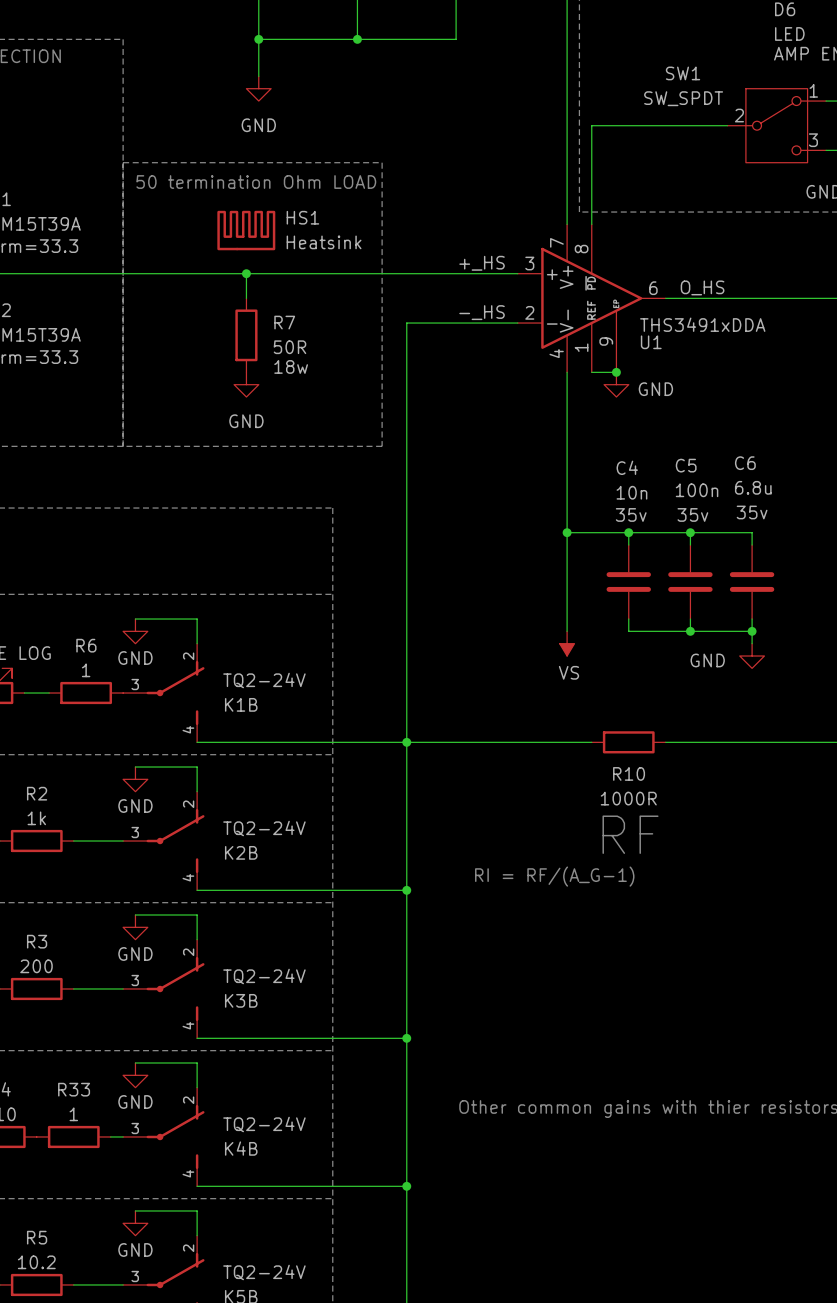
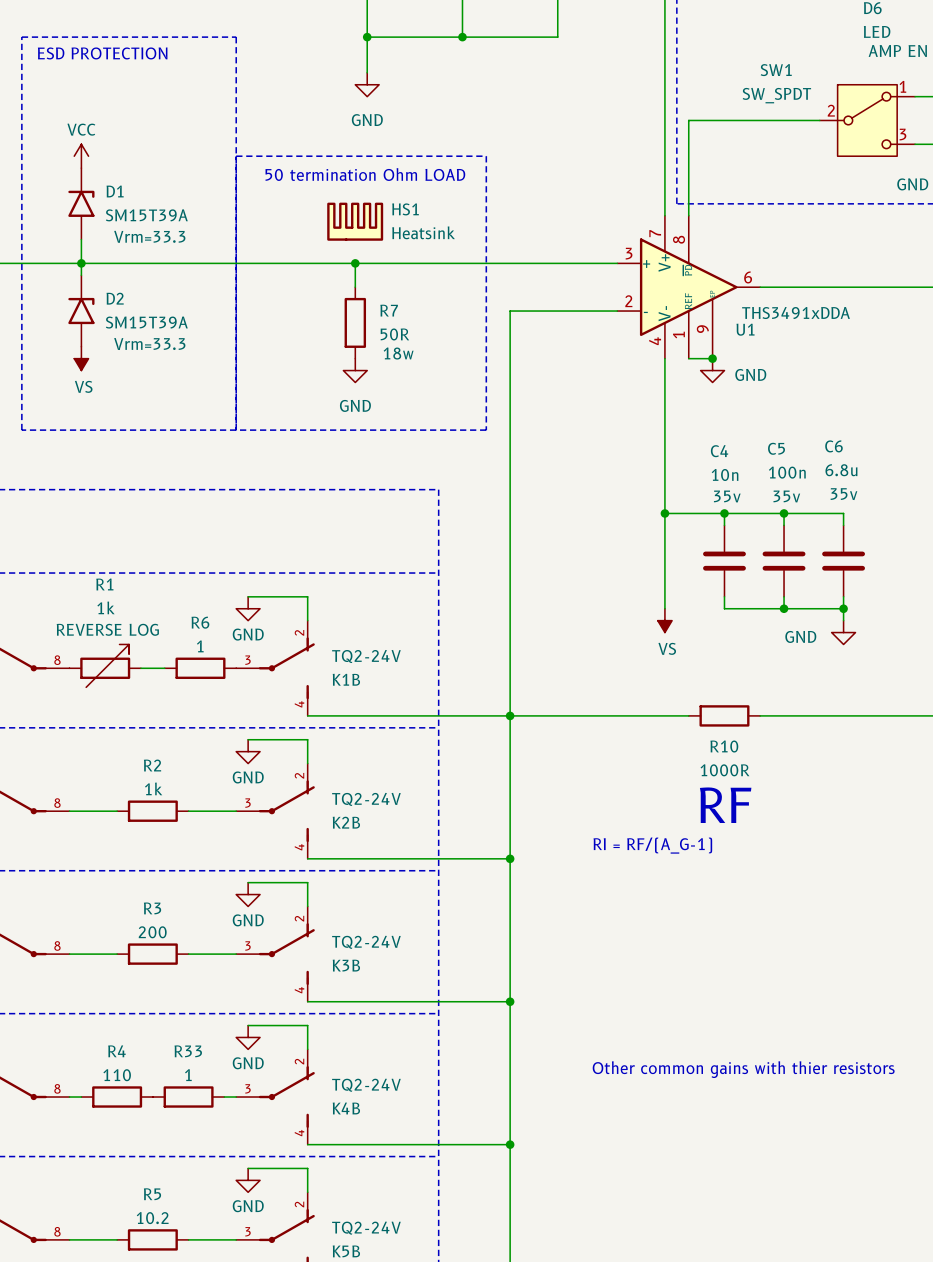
label: +_HS (482, 263) -> none
label: O_HS (702, 287) -> none
label: -_HS (482, 312) -> none

